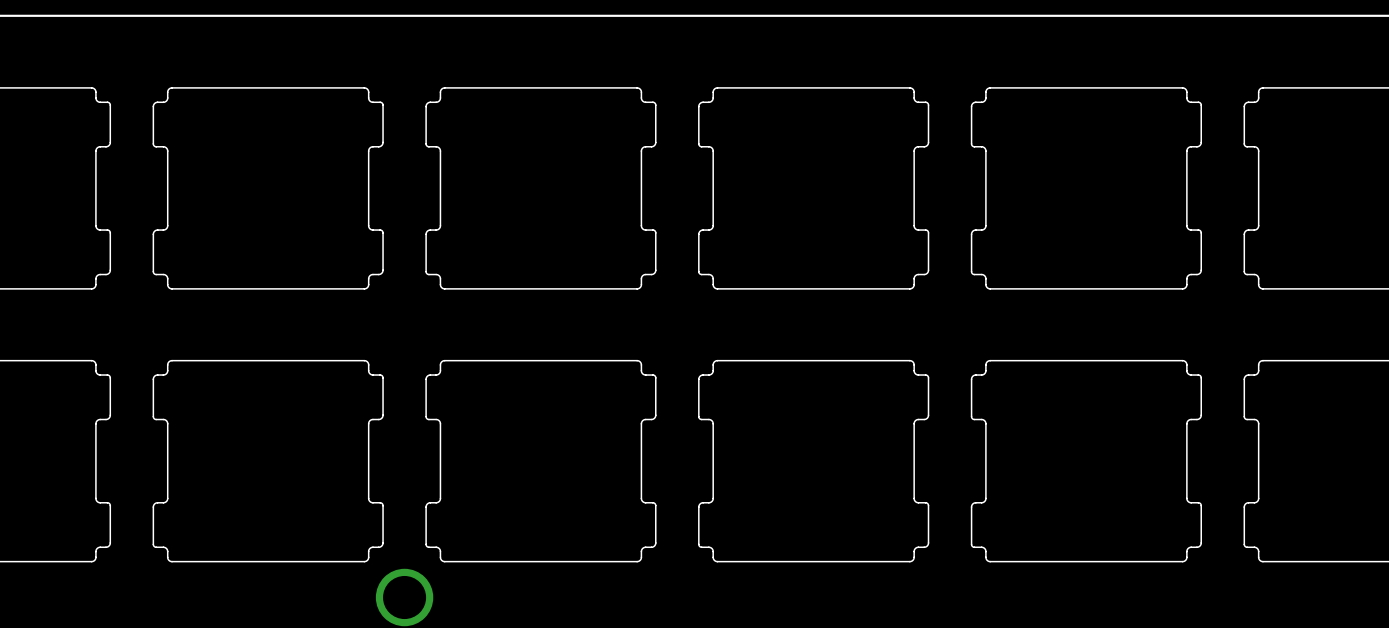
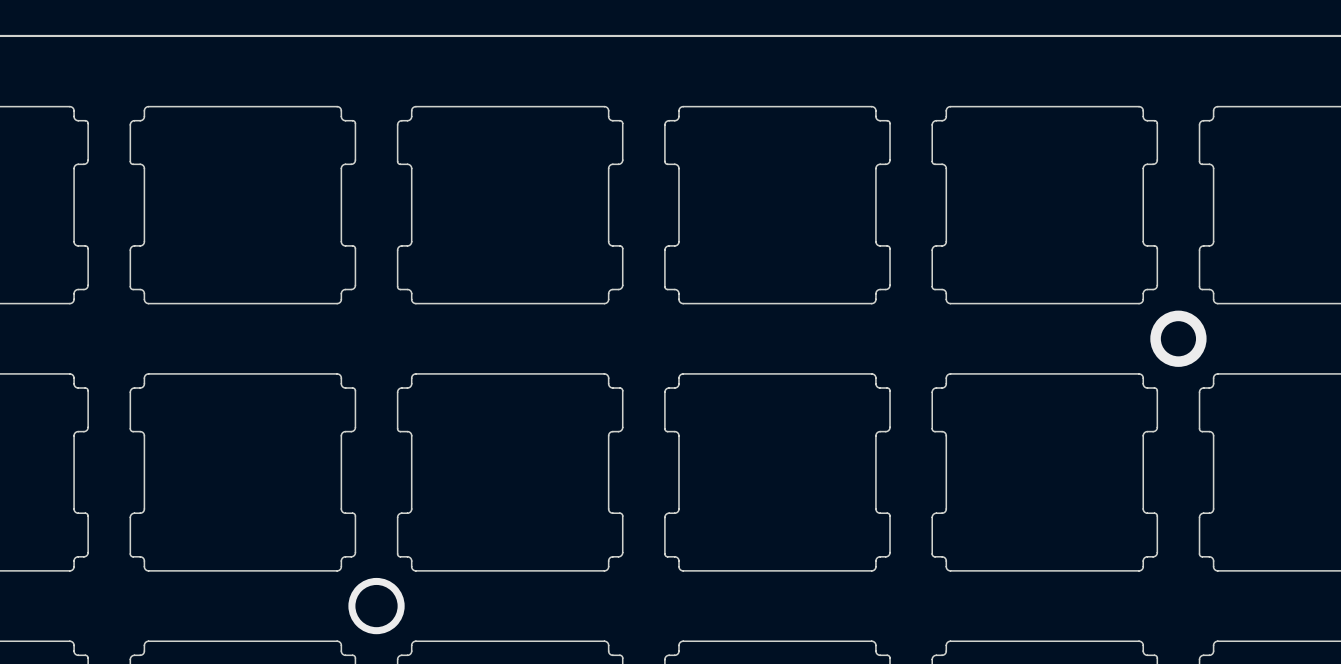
via: none -> (1178, 338)

